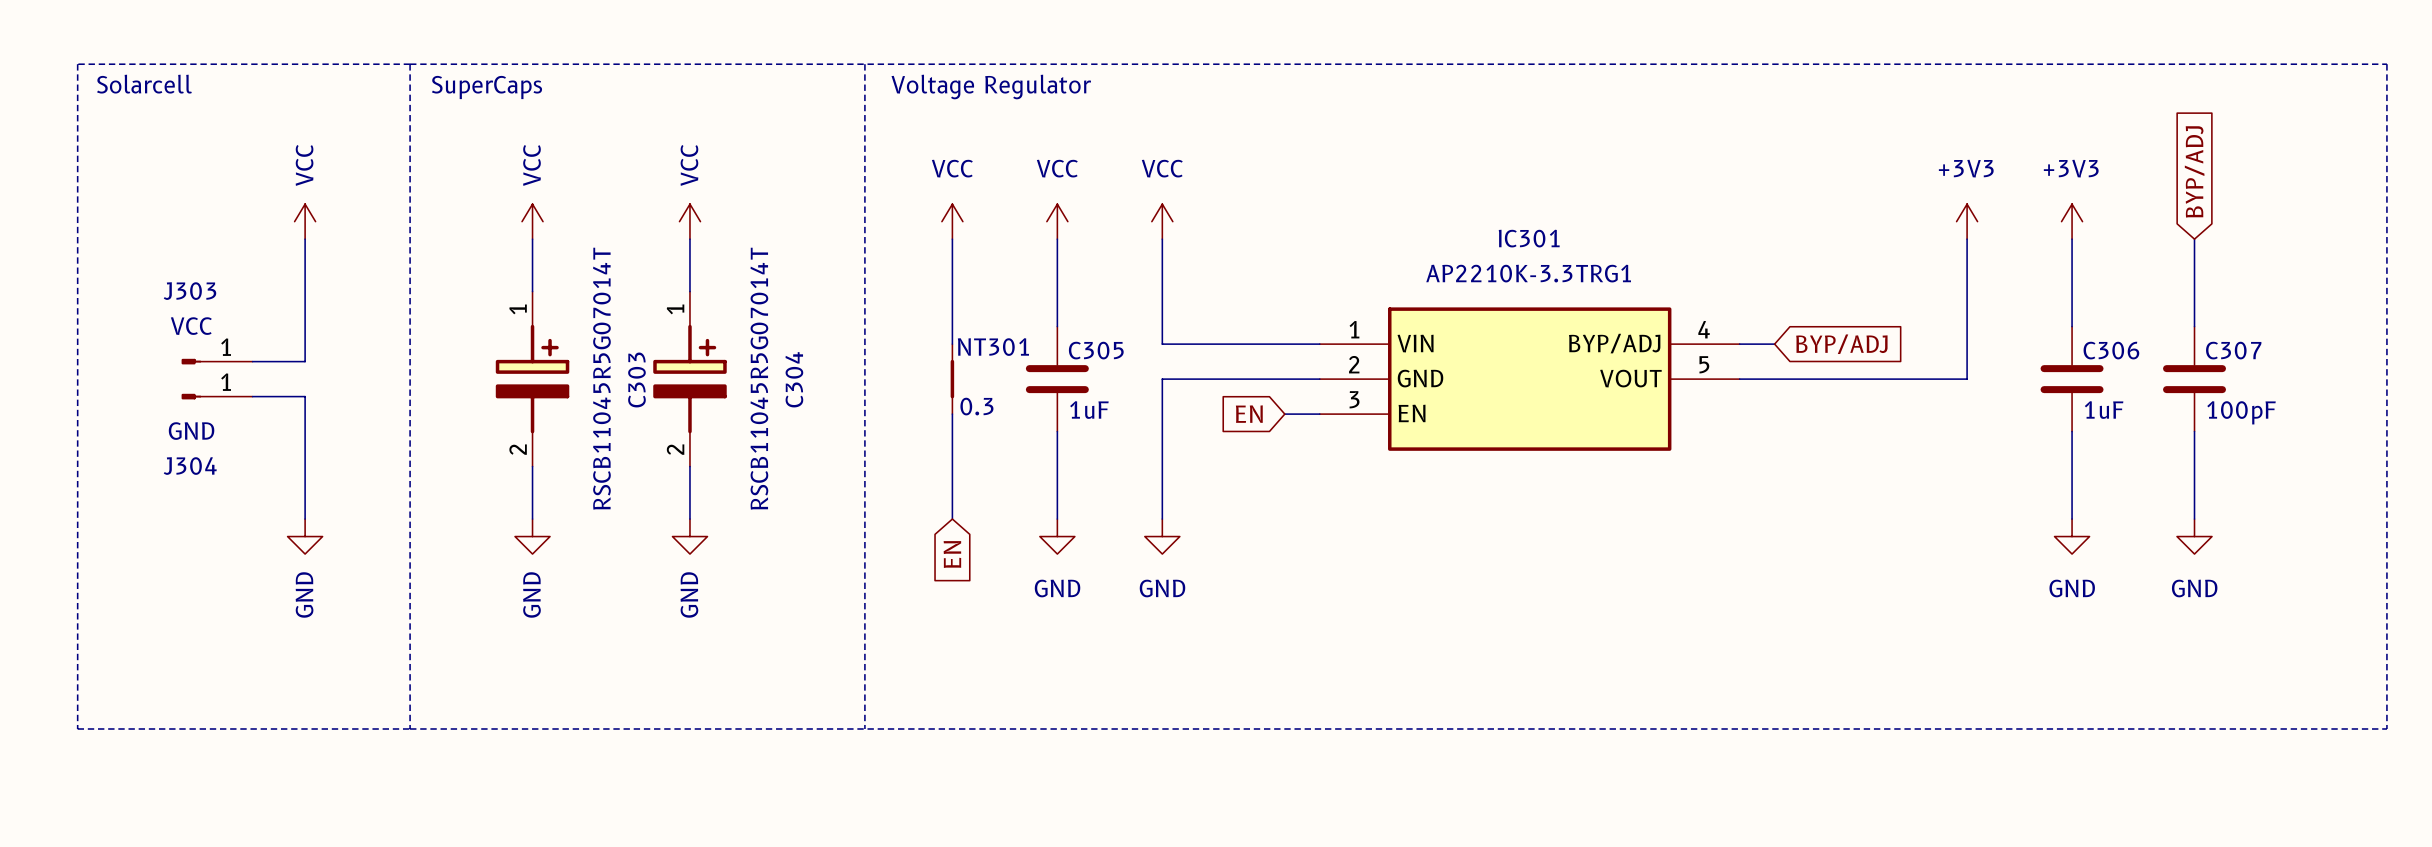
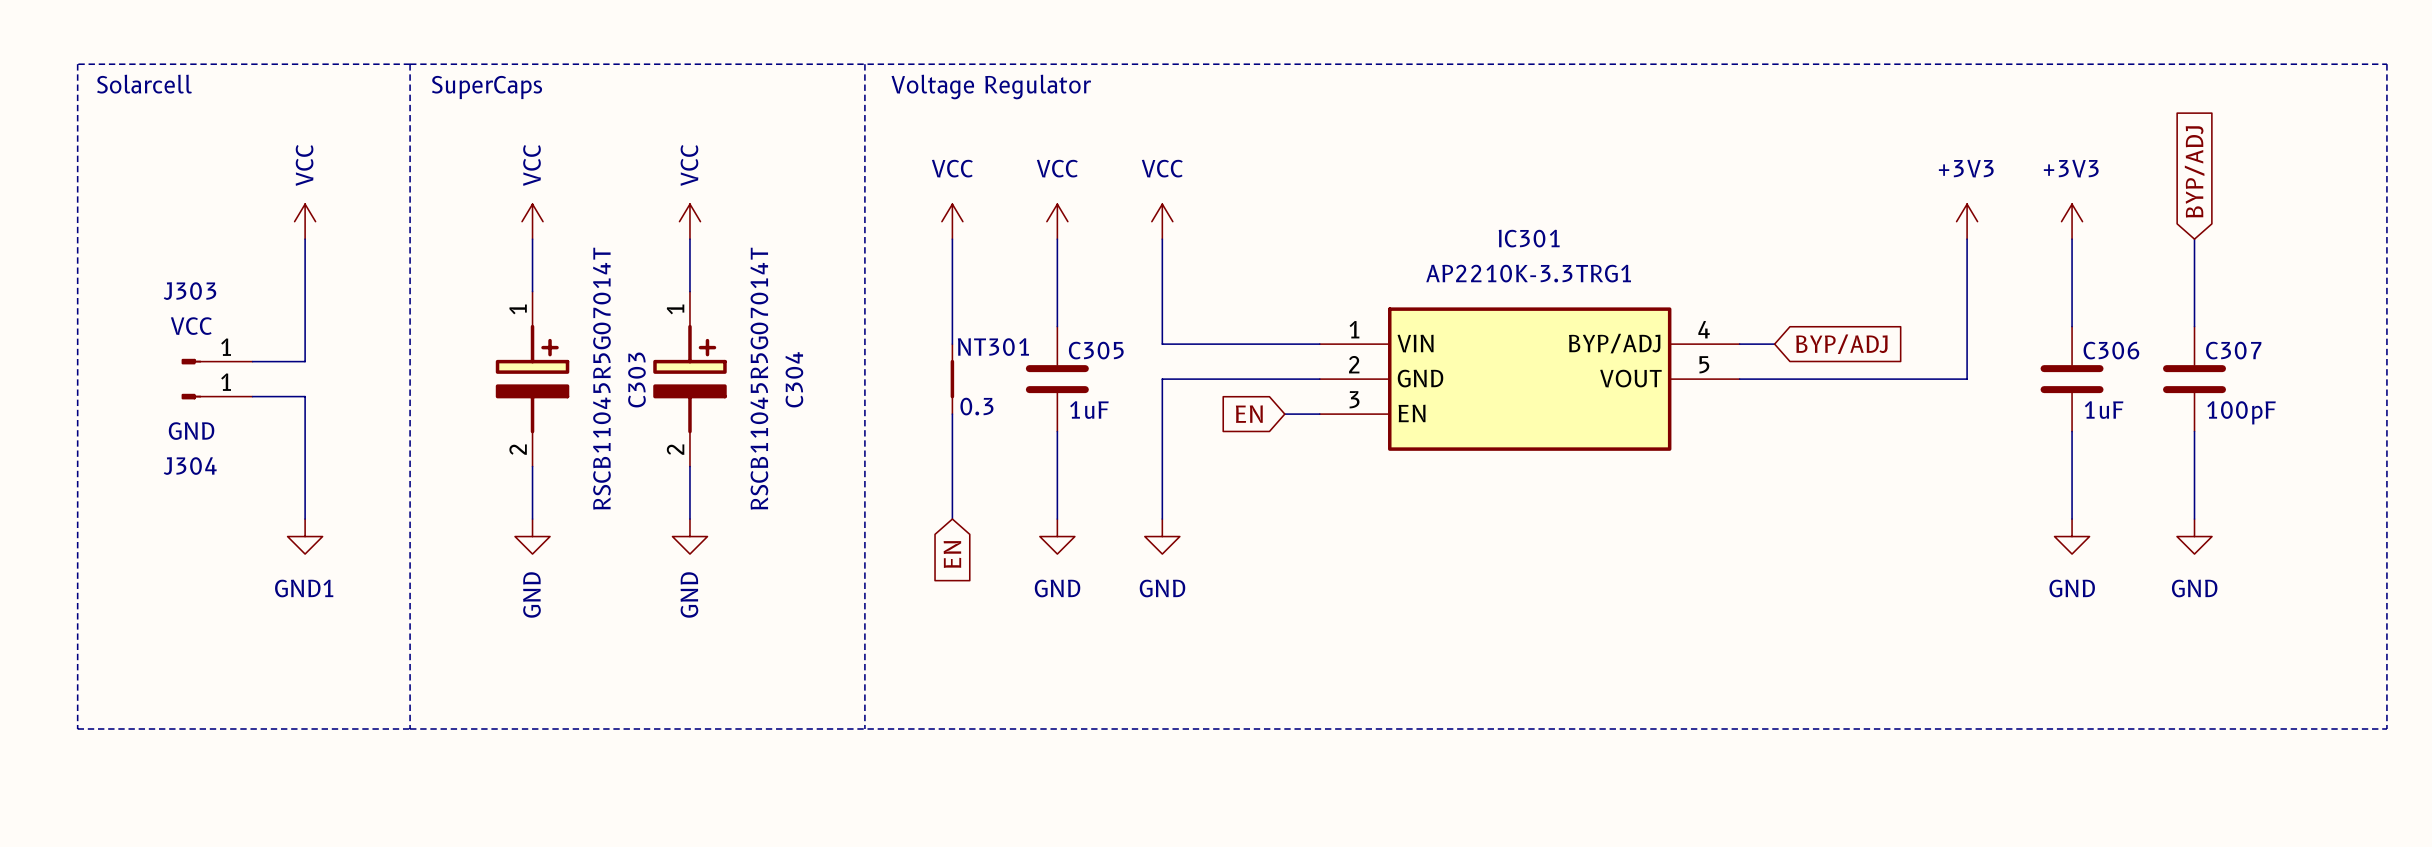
power symbol: GND (305, 536) -> GND1 (305, 536)

